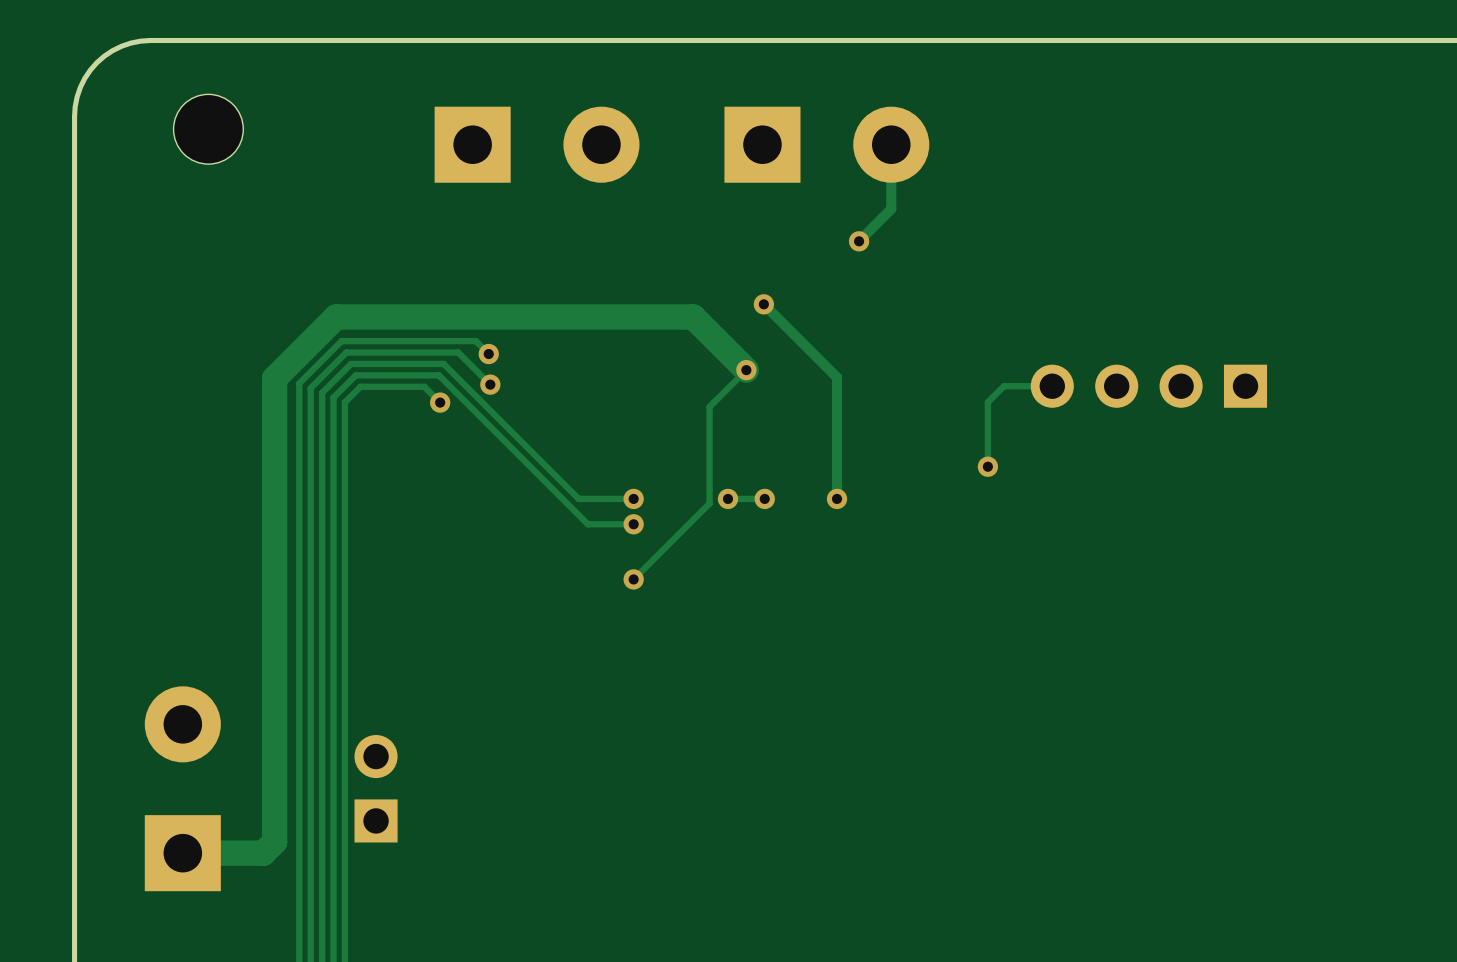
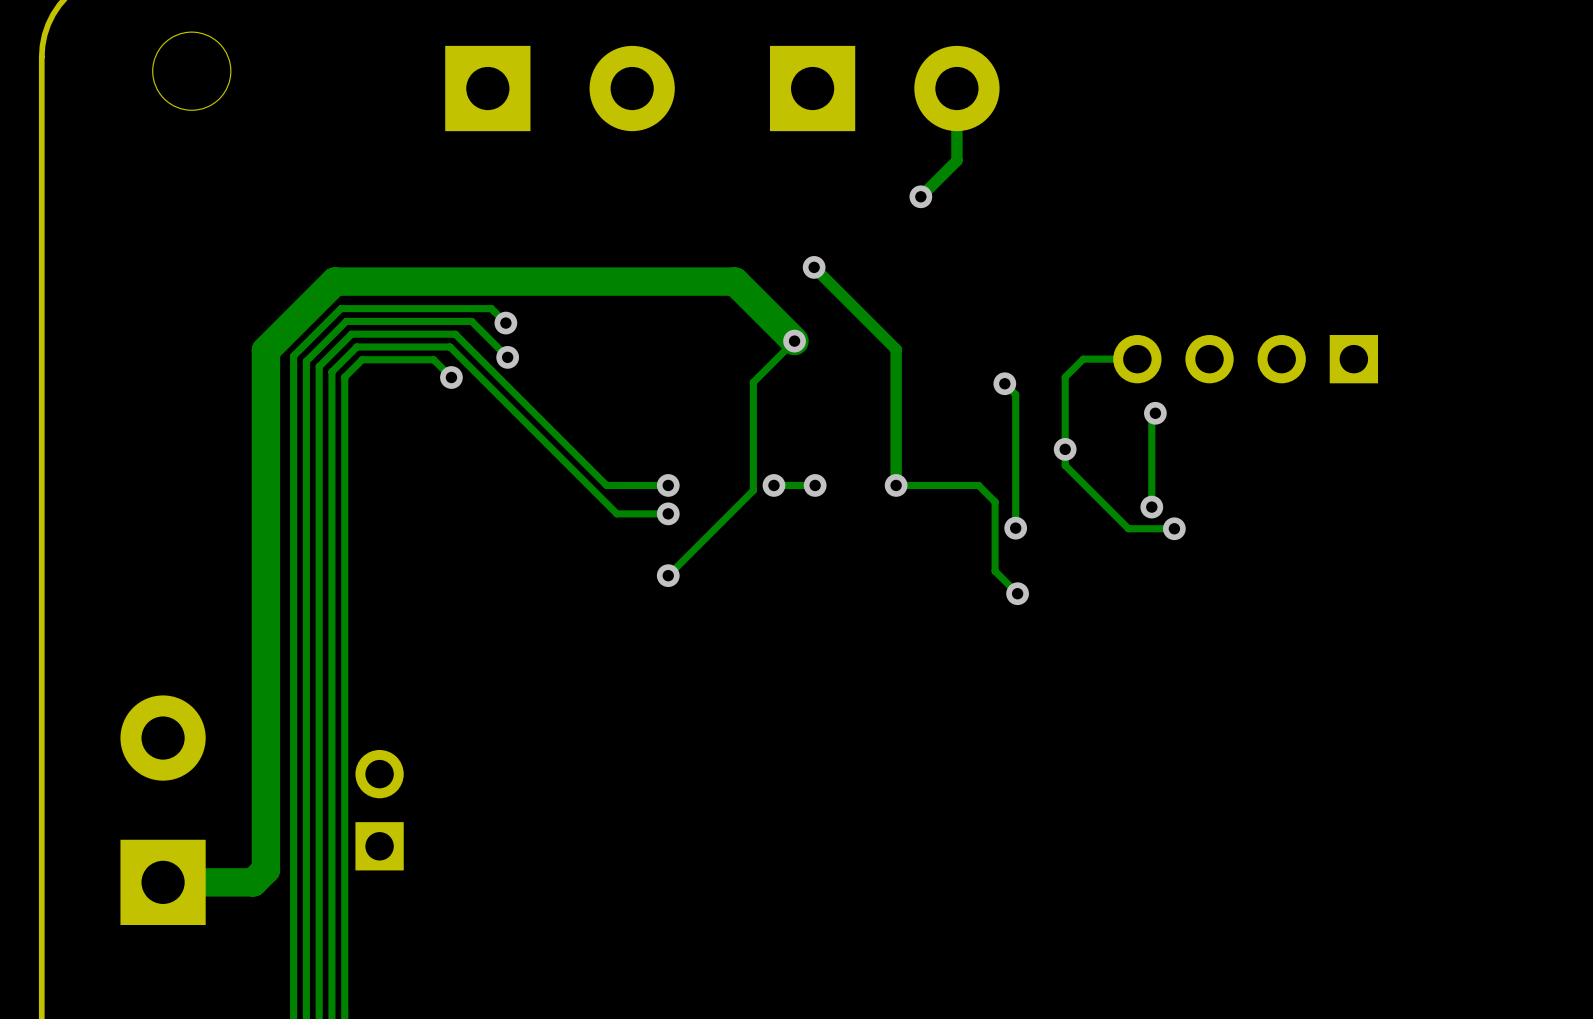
track: none -> (1004, 383) (1015, 394) (1015, 528)
via: none -> (1004, 383)
track: none -> (1155, 413) (1151, 416) (1151, 507)
via: none -> (1155, 413)
track: none -> (1065, 449) (1065, 465) (1128, 528) (1174, 528)
track: none -> (896, 485) (978, 485) (995, 501) (995, 571) (1017, 593)
via: none -> (1151, 507)
via: none -> (1015, 528)
via: none -> (1174, 528)
via: none -> (1017, 593)

